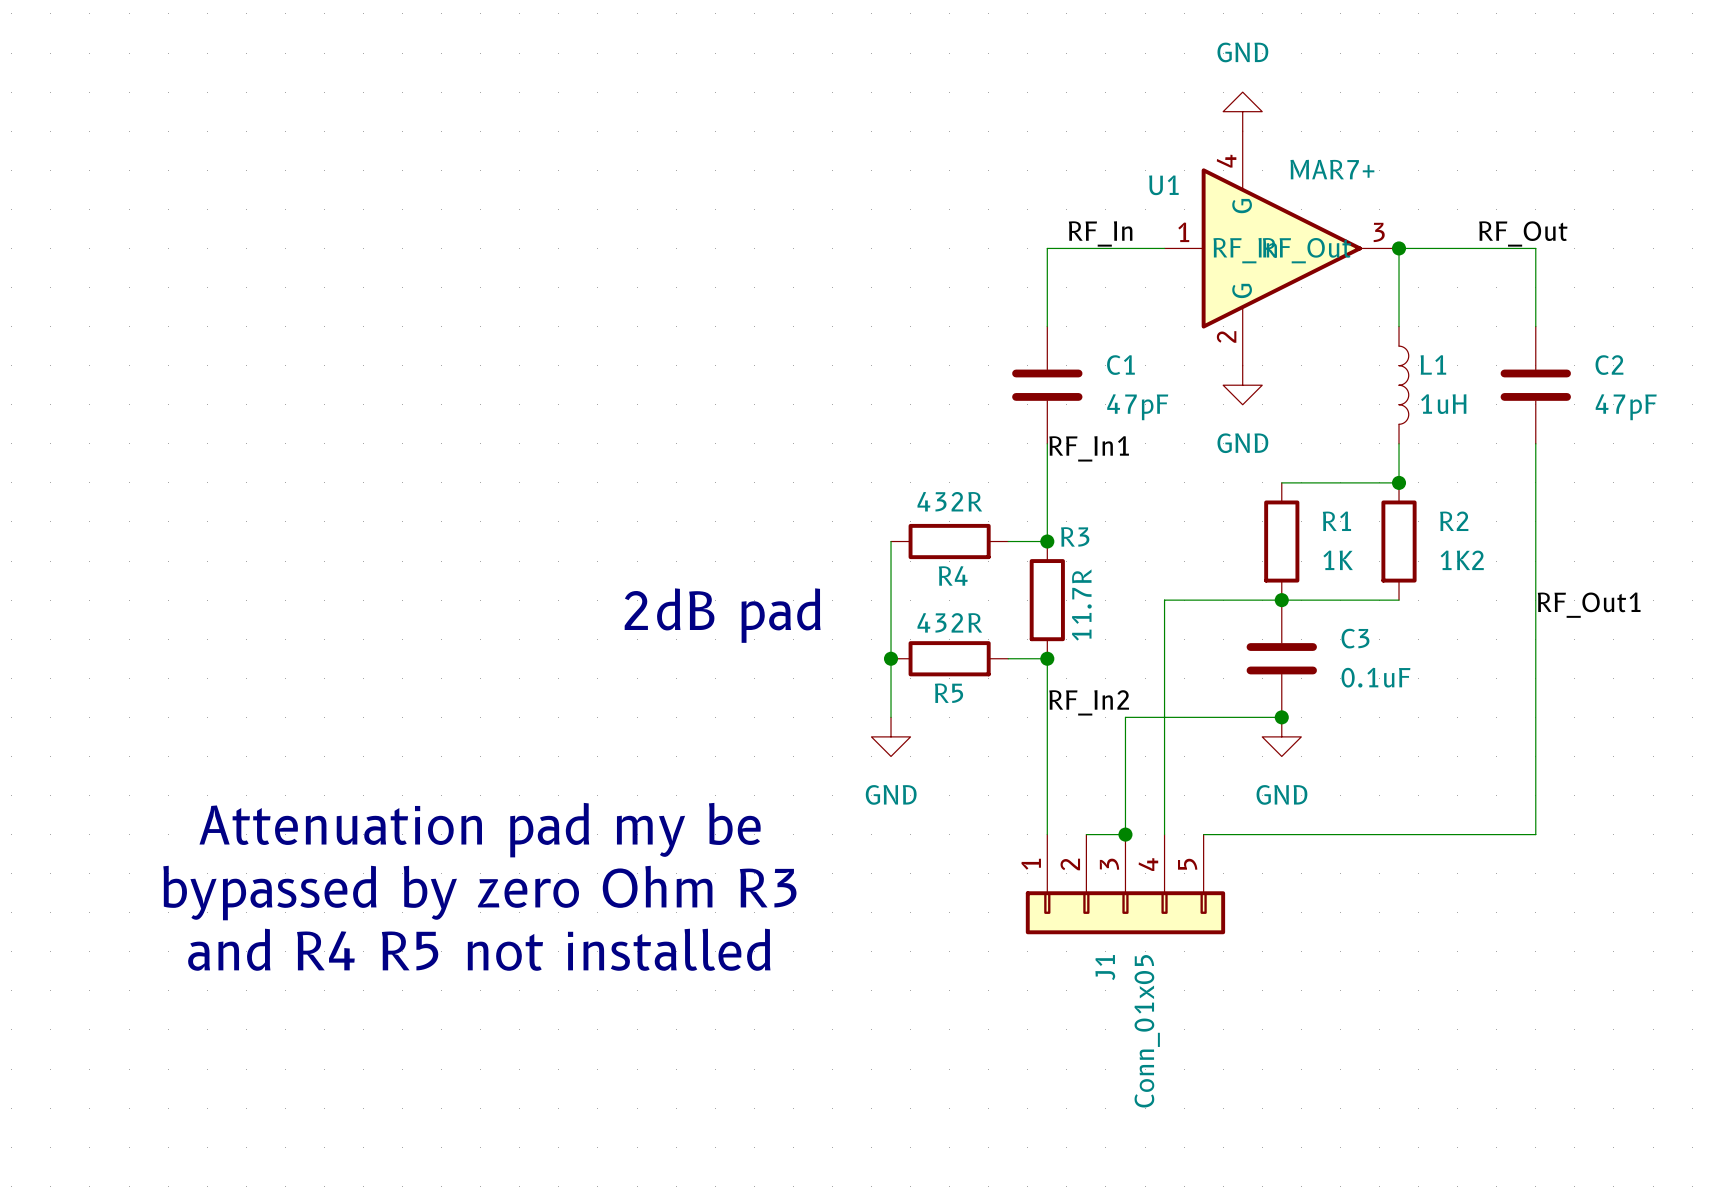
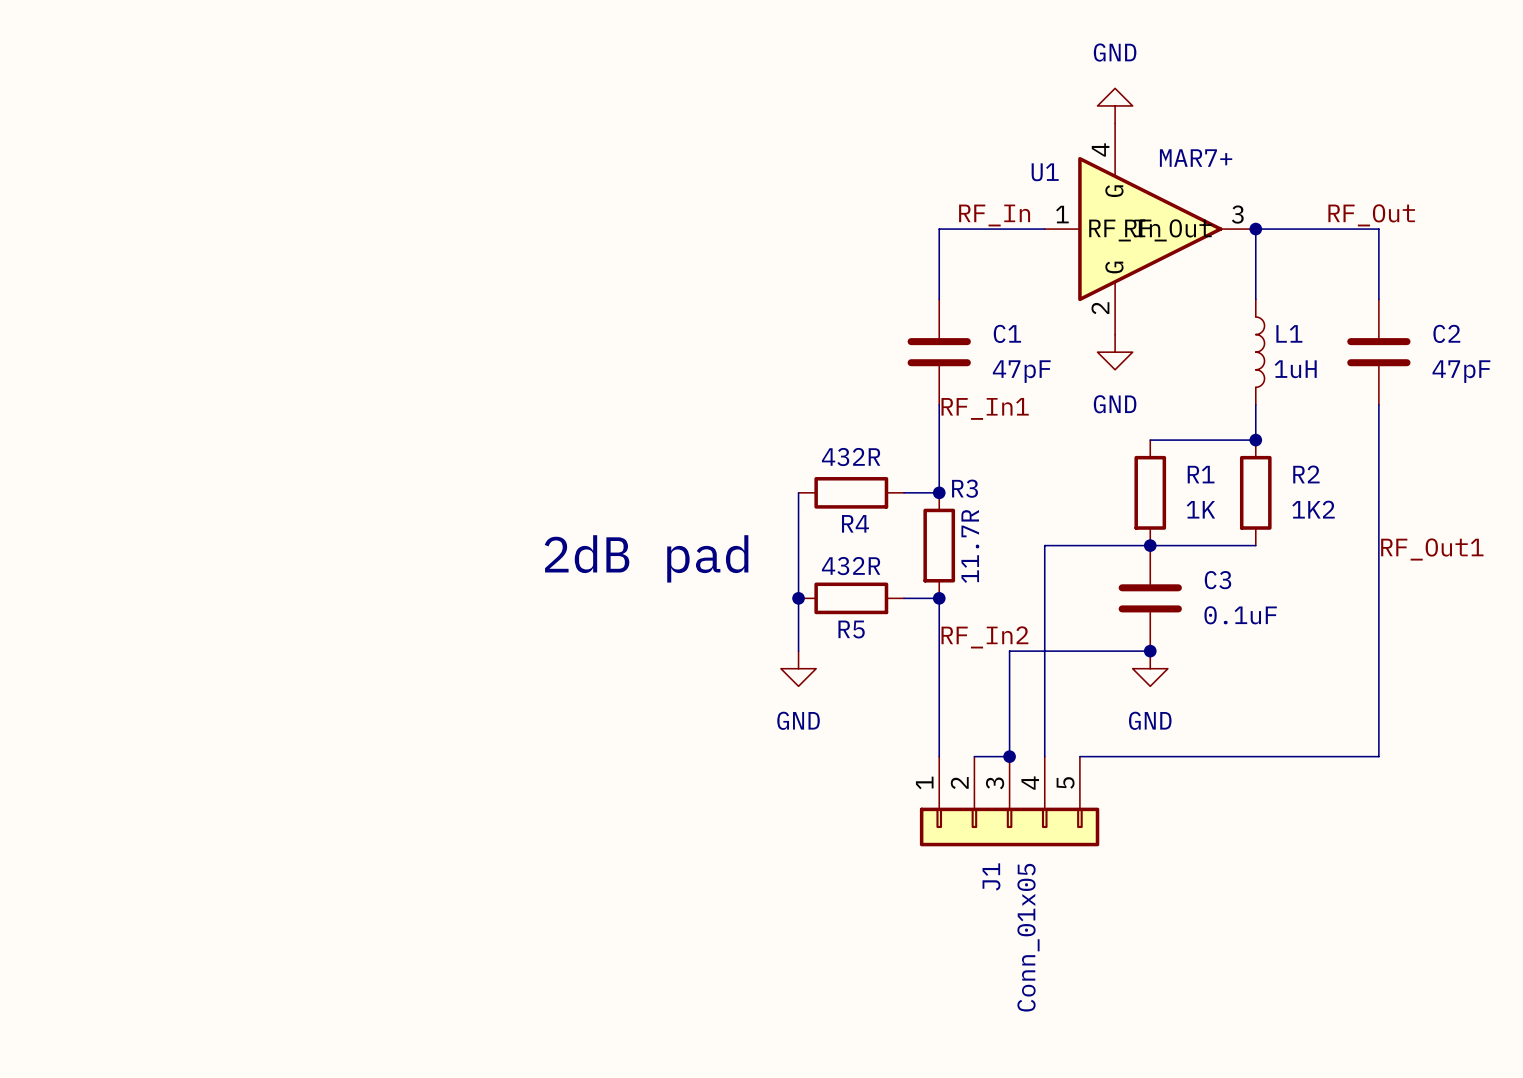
text: Attenuation pad my be (480, 830) -> none
text: bypassed by zero Ohm R3 (479, 893) -> none
text: and R4 R5 not installed (479, 949) -> none

